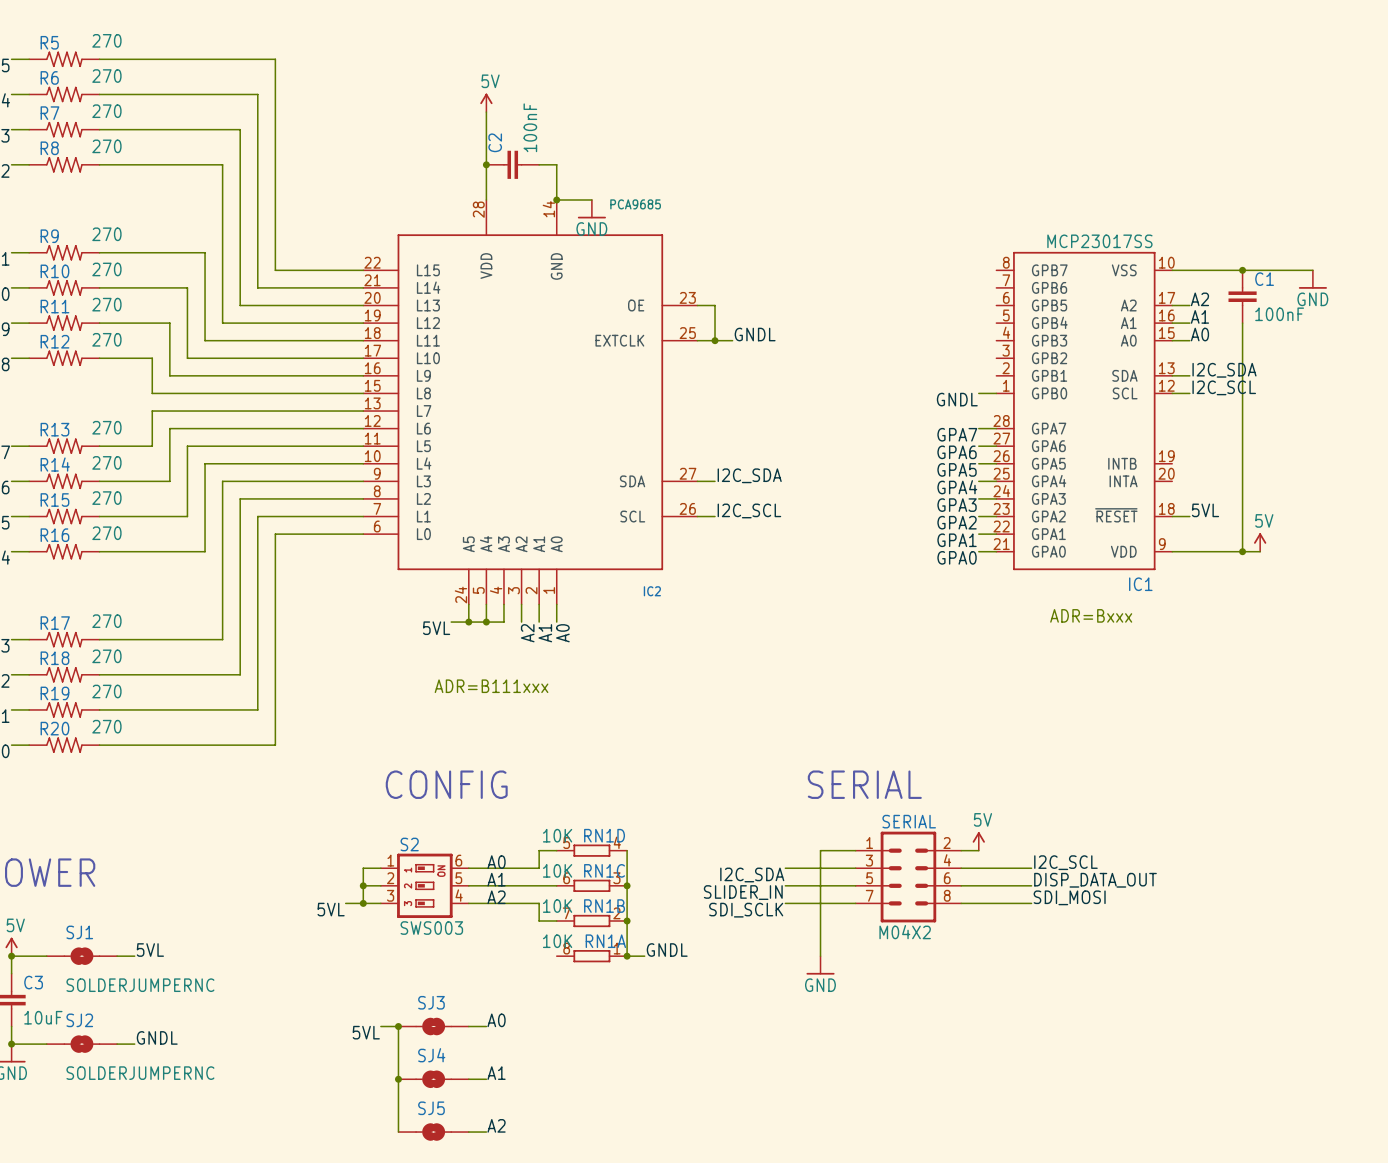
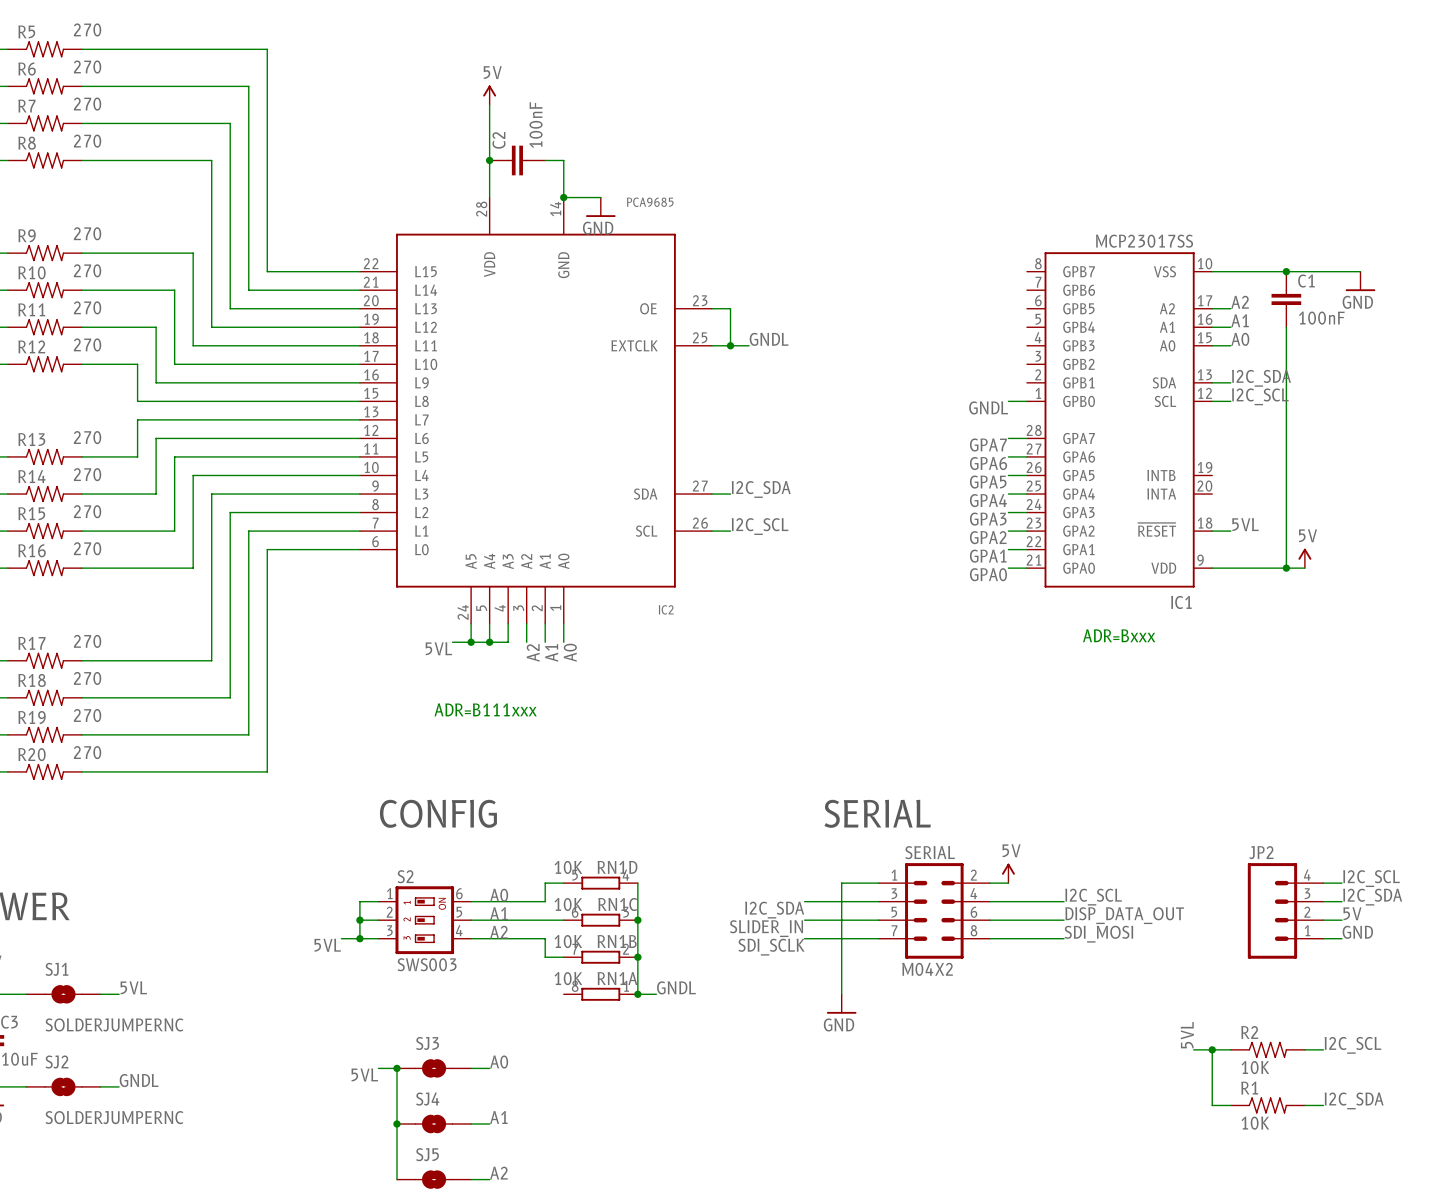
label: none -> I2C_SCL (1371, 878)
wire: none -> (1323, 883) (1341, 883)
label: none -> I2C_SDA (1372, 897)
wire: none -> (1323, 901) (1341, 901)
JP2: none -> (1285, 910)
label: none -> 5V (1352, 913)
wire: none -> (1323, 920) (1341, 920)
label: none -> GND (1357, 932)
wire: none -> (1323, 938) (1341, 938)
label: none -> 5VL (1187, 1035)
label: none -> I2C_SCL (1352, 1045)
wire: none -> (1193, 1049) (1230, 1049)
wire: none -> (1212, 1049) (1212, 1105) (1230, 1105)
junction: none -> (1212, 1049)
R2: none -> 10K (1267, 1049)
wire: none -> (1304, 1049) (1323, 1049)
label: none -> I2C_SDA (1354, 1100)
R1: none -> 10K (1267, 1105)
wire: none -> (1304, 1105) (1323, 1105)

